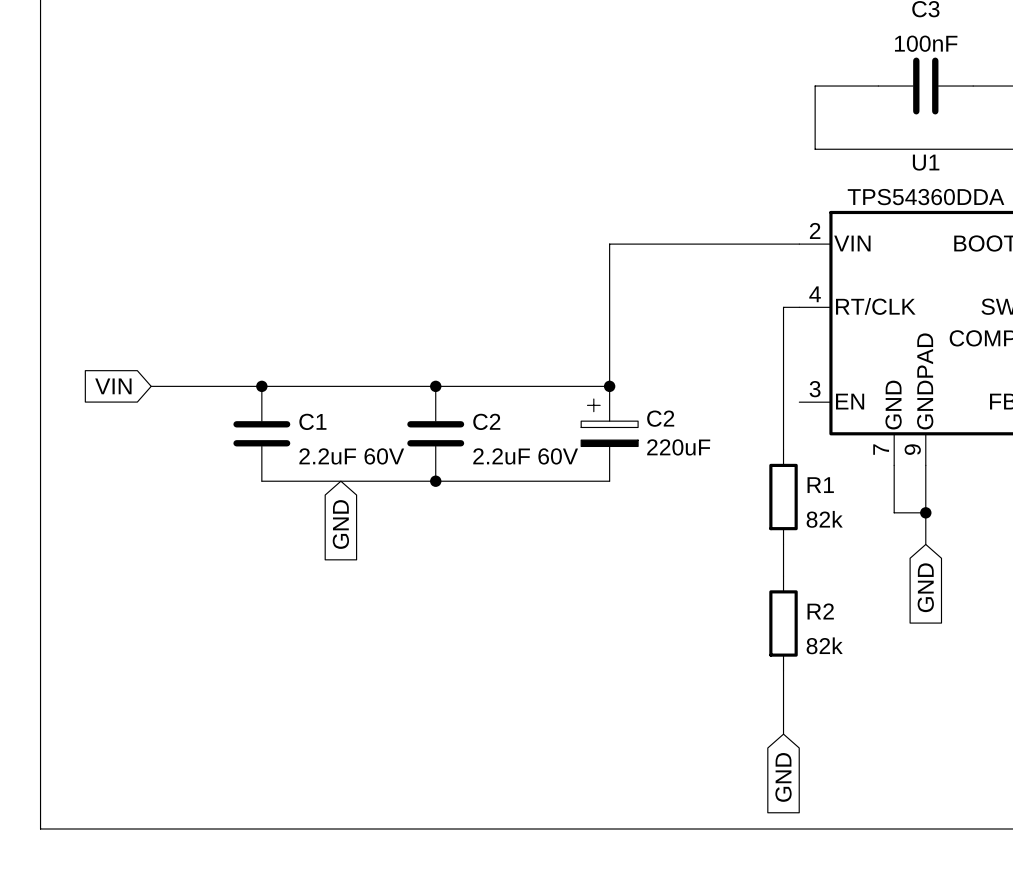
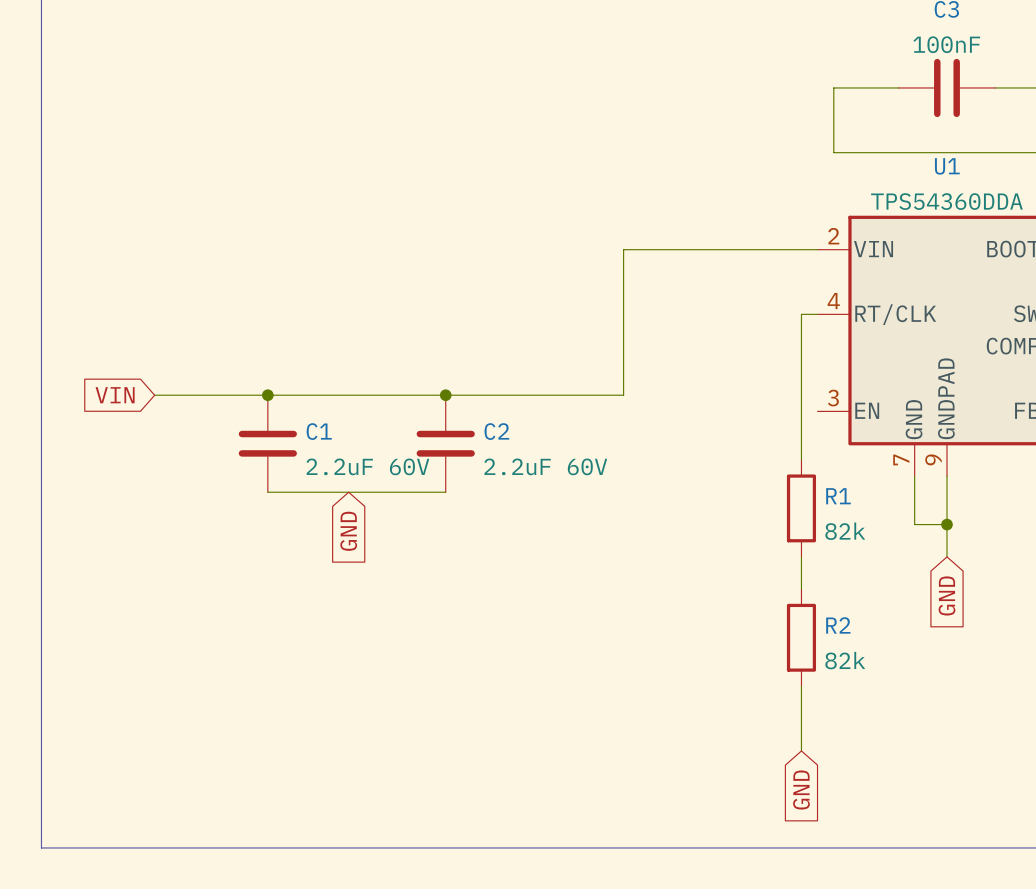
junction: (609, 386) -> none
C2: 220uF (609, 433) -> none
wire: (435, 481) (609, 481) -> none
junction: (435, 481) -> none

